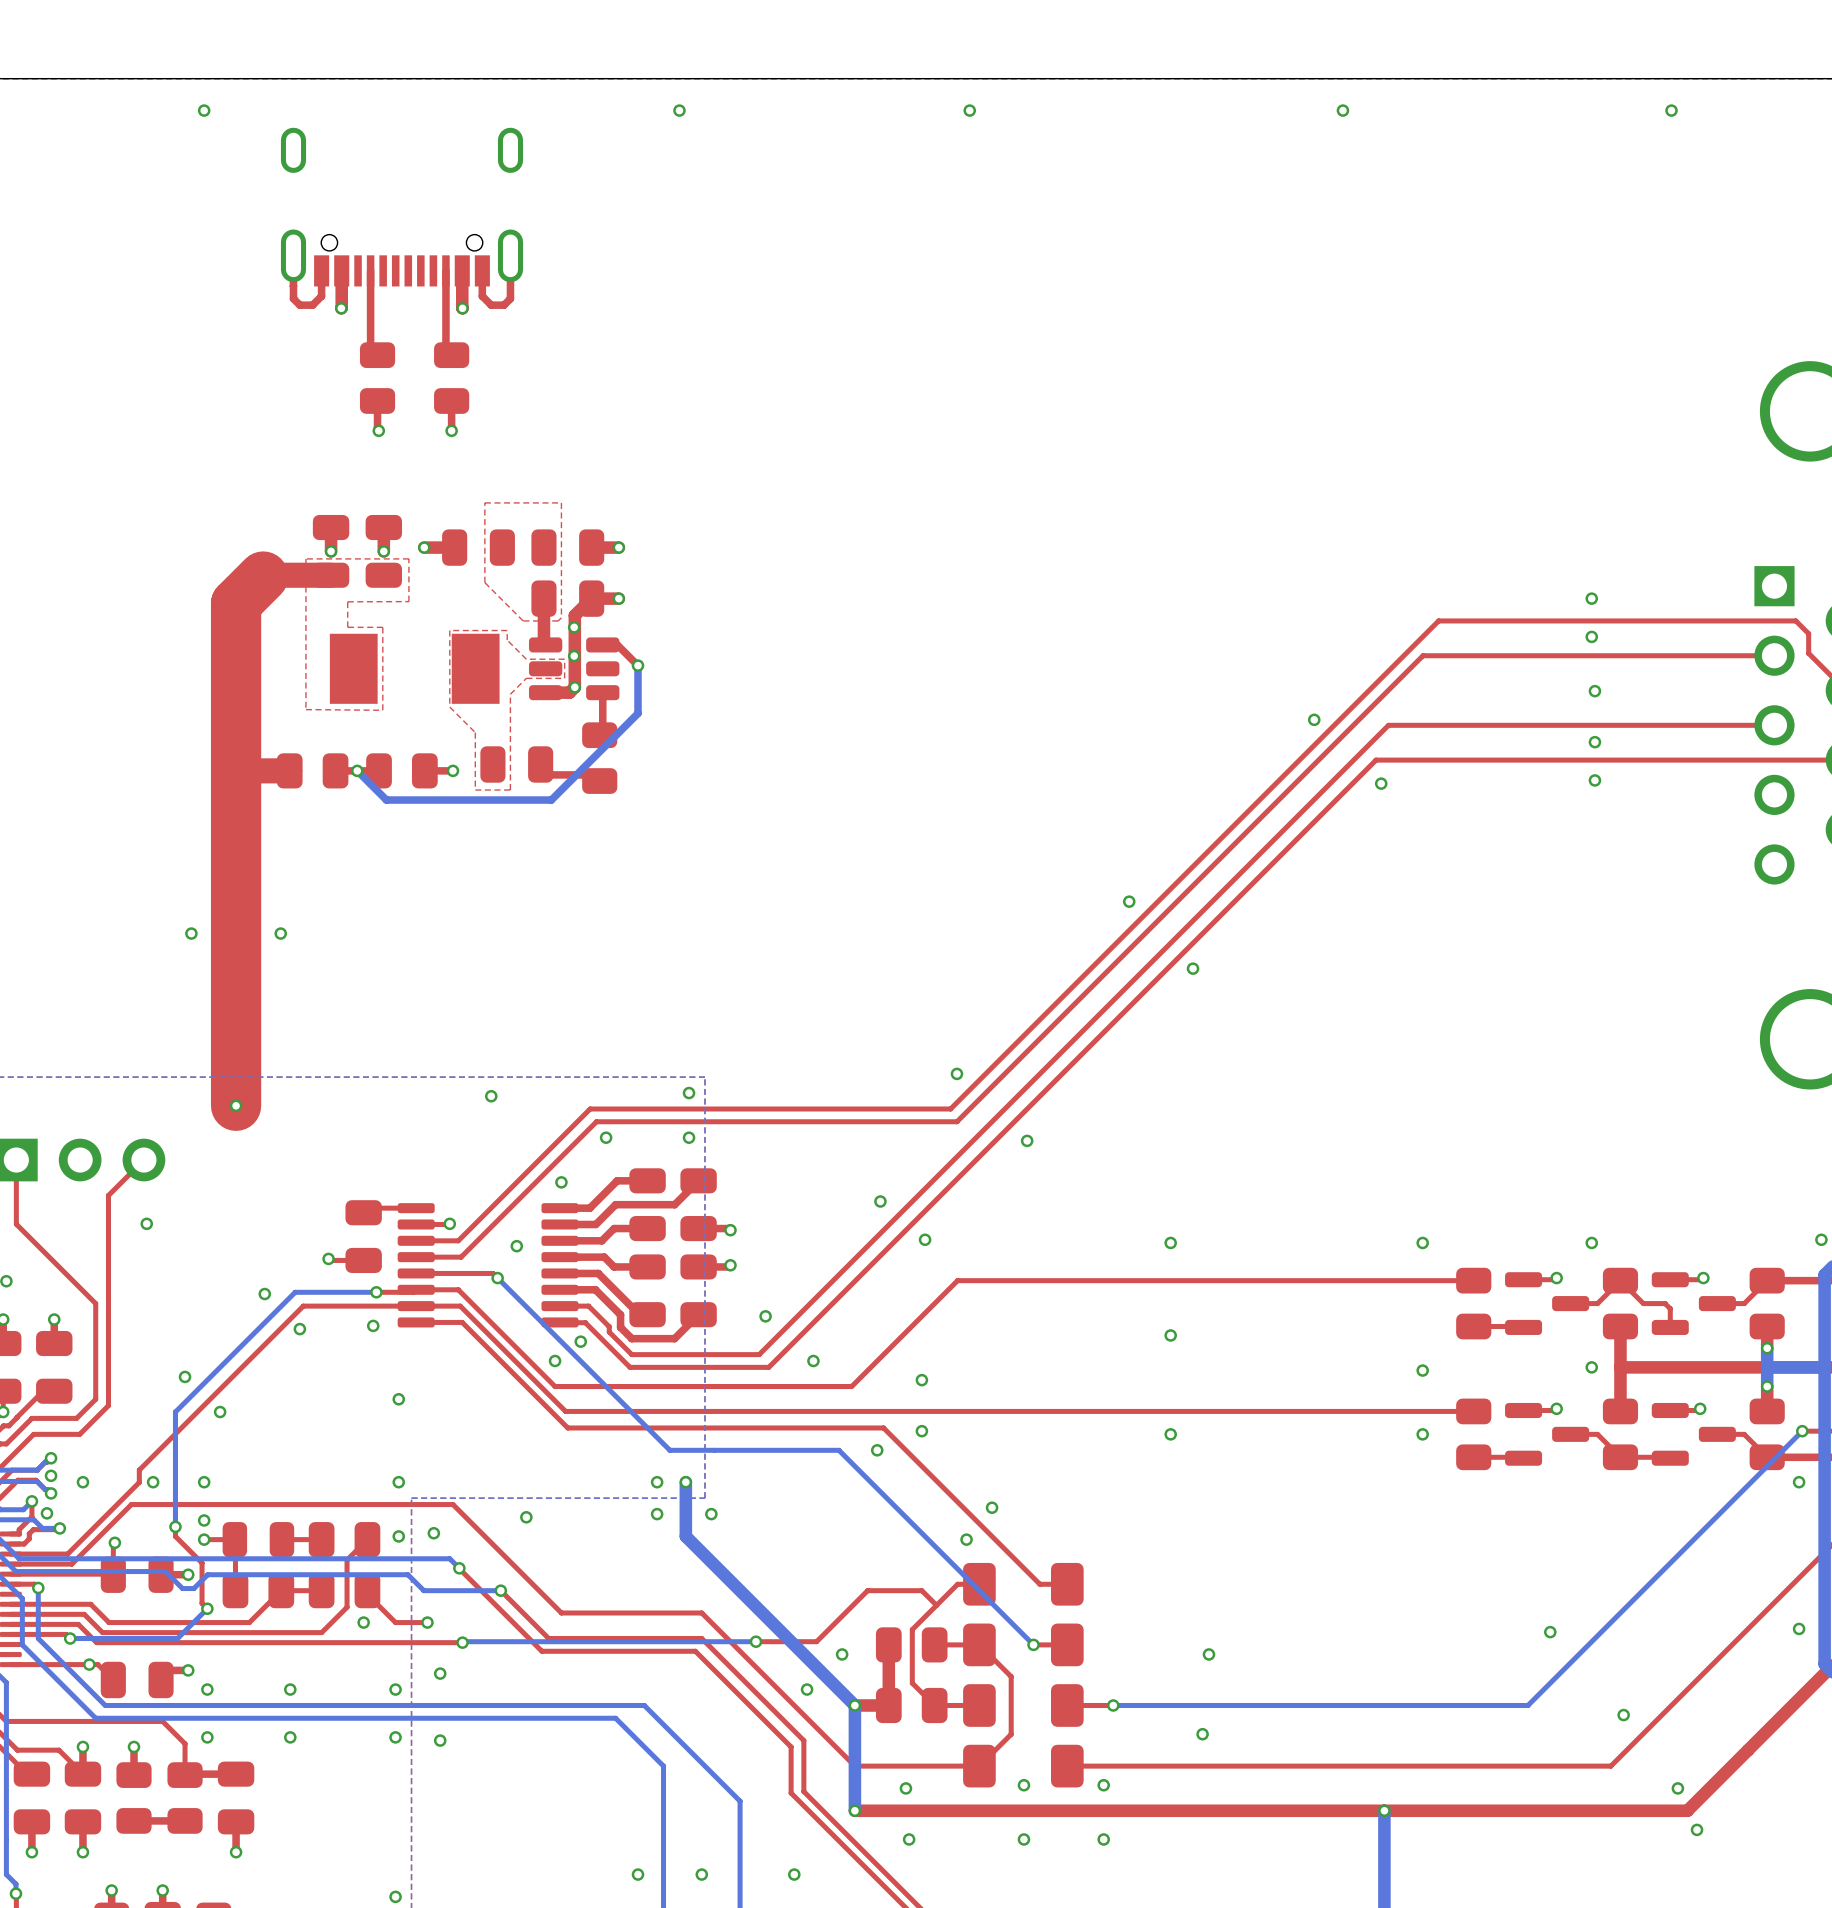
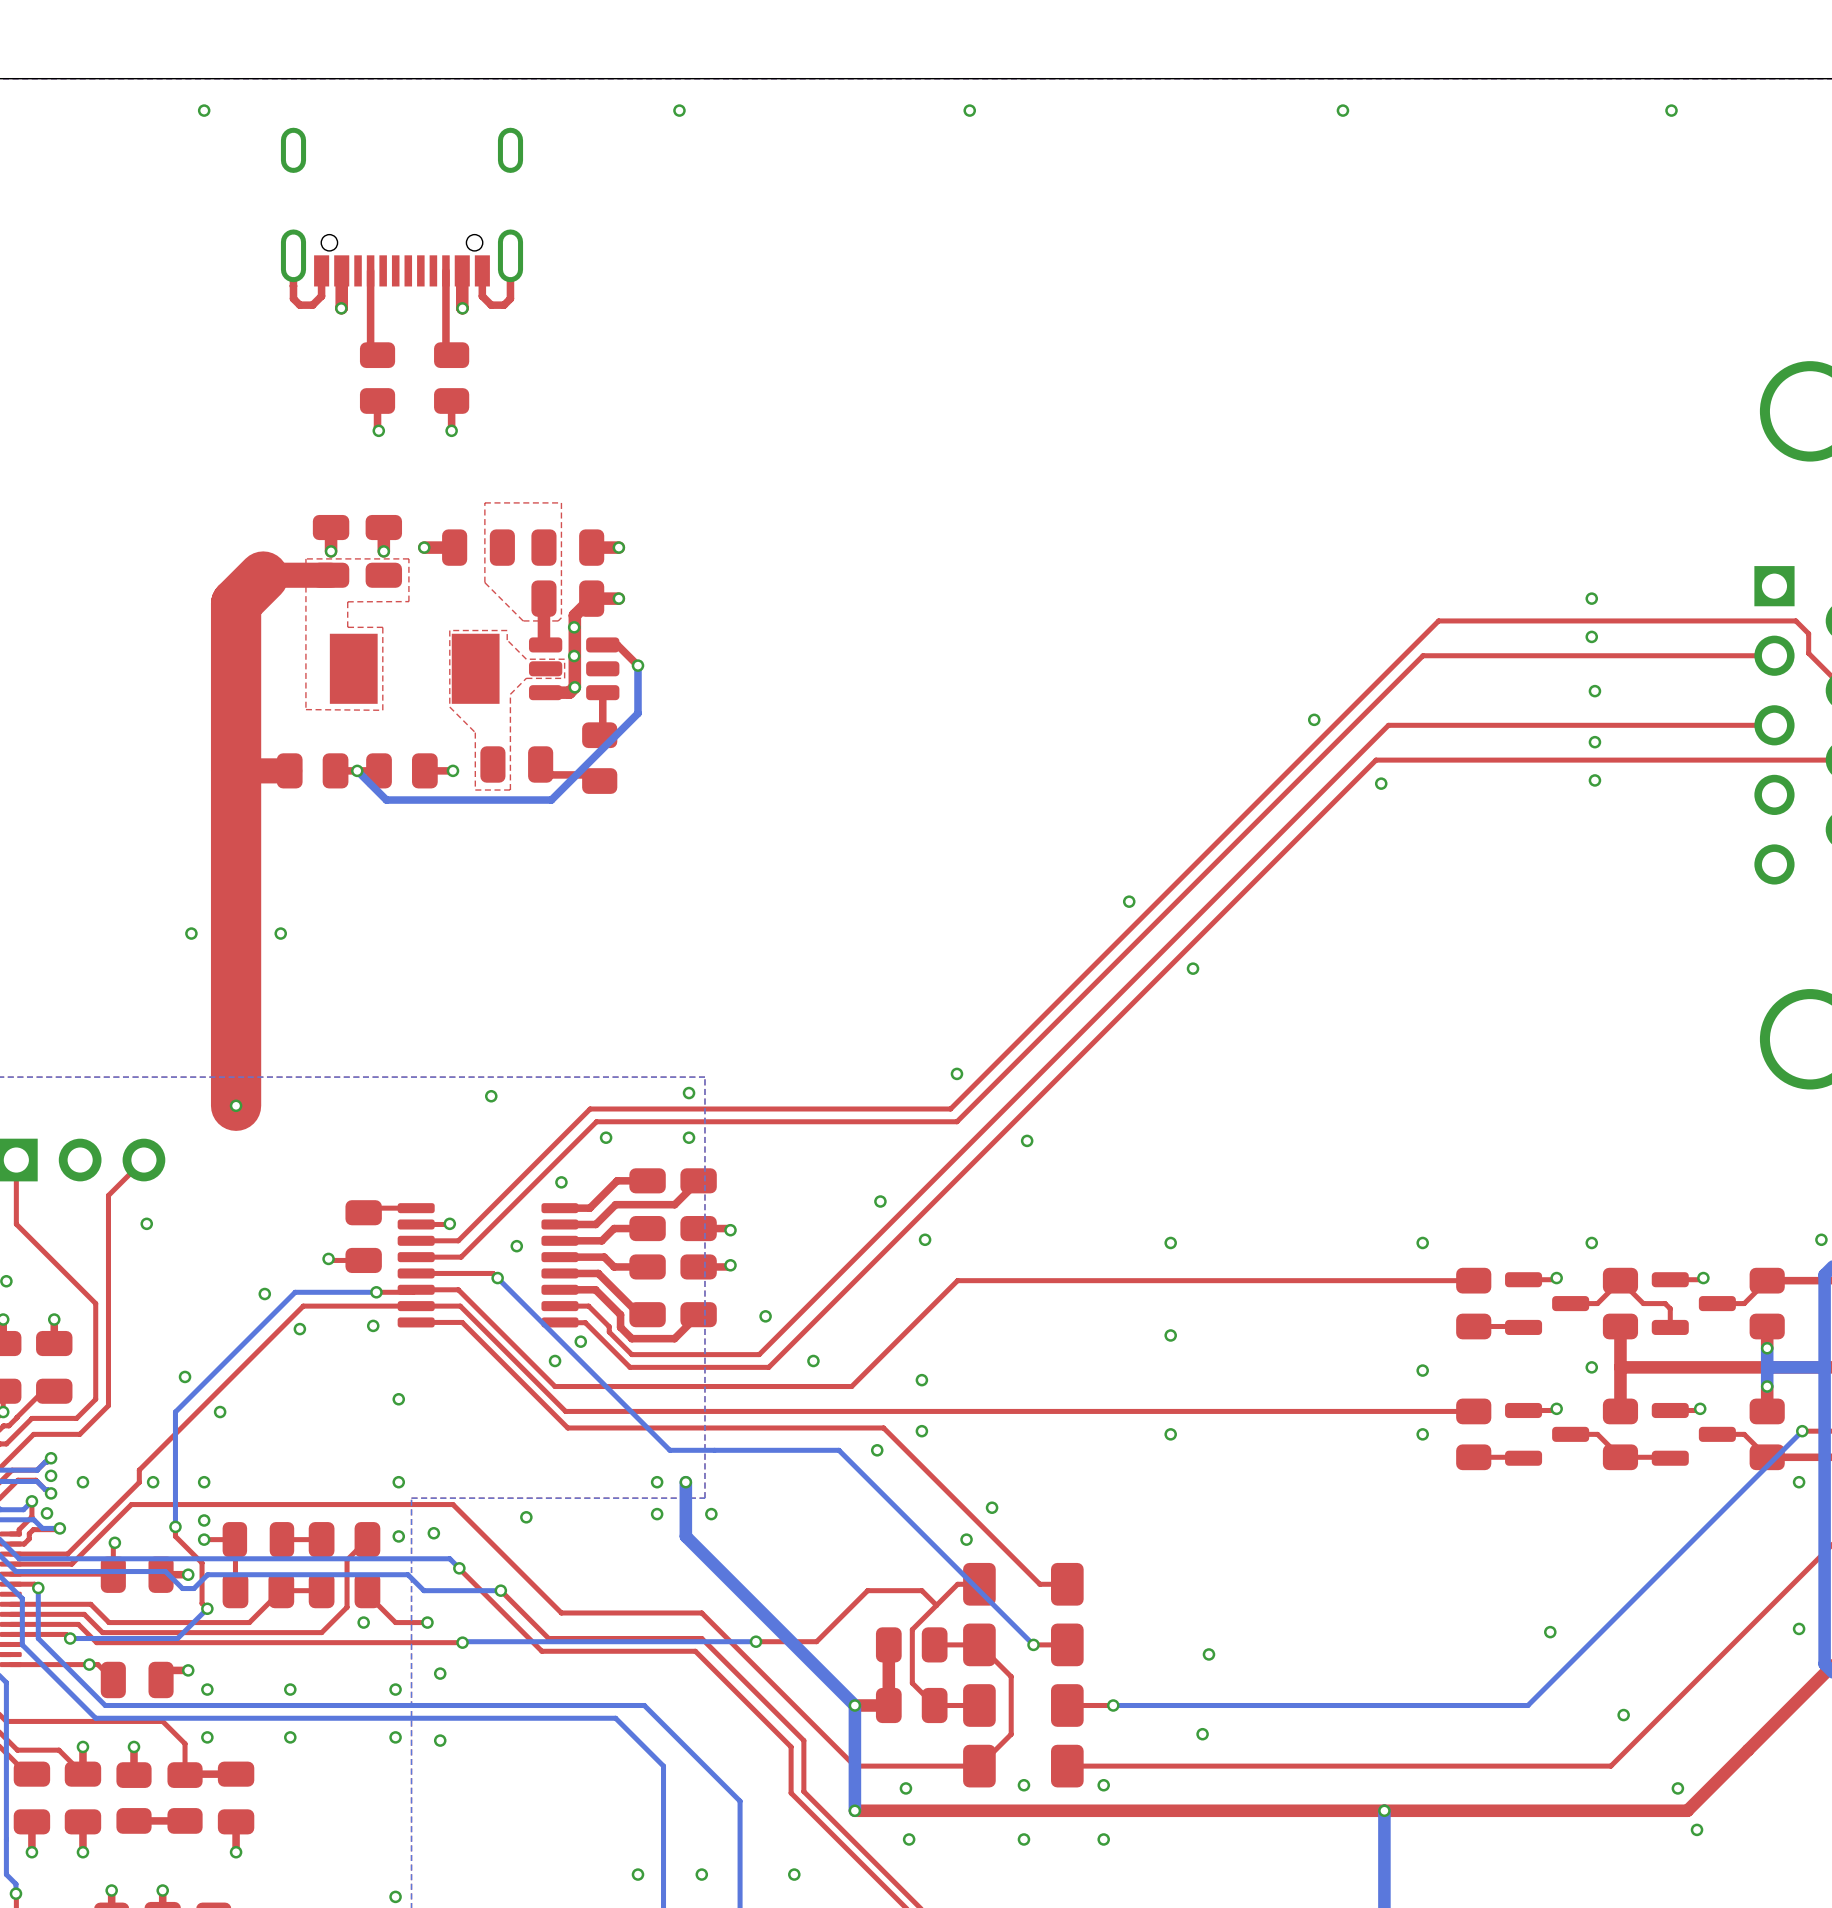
via: (842, 1654) -> none
via: (807, 1689) -> none

